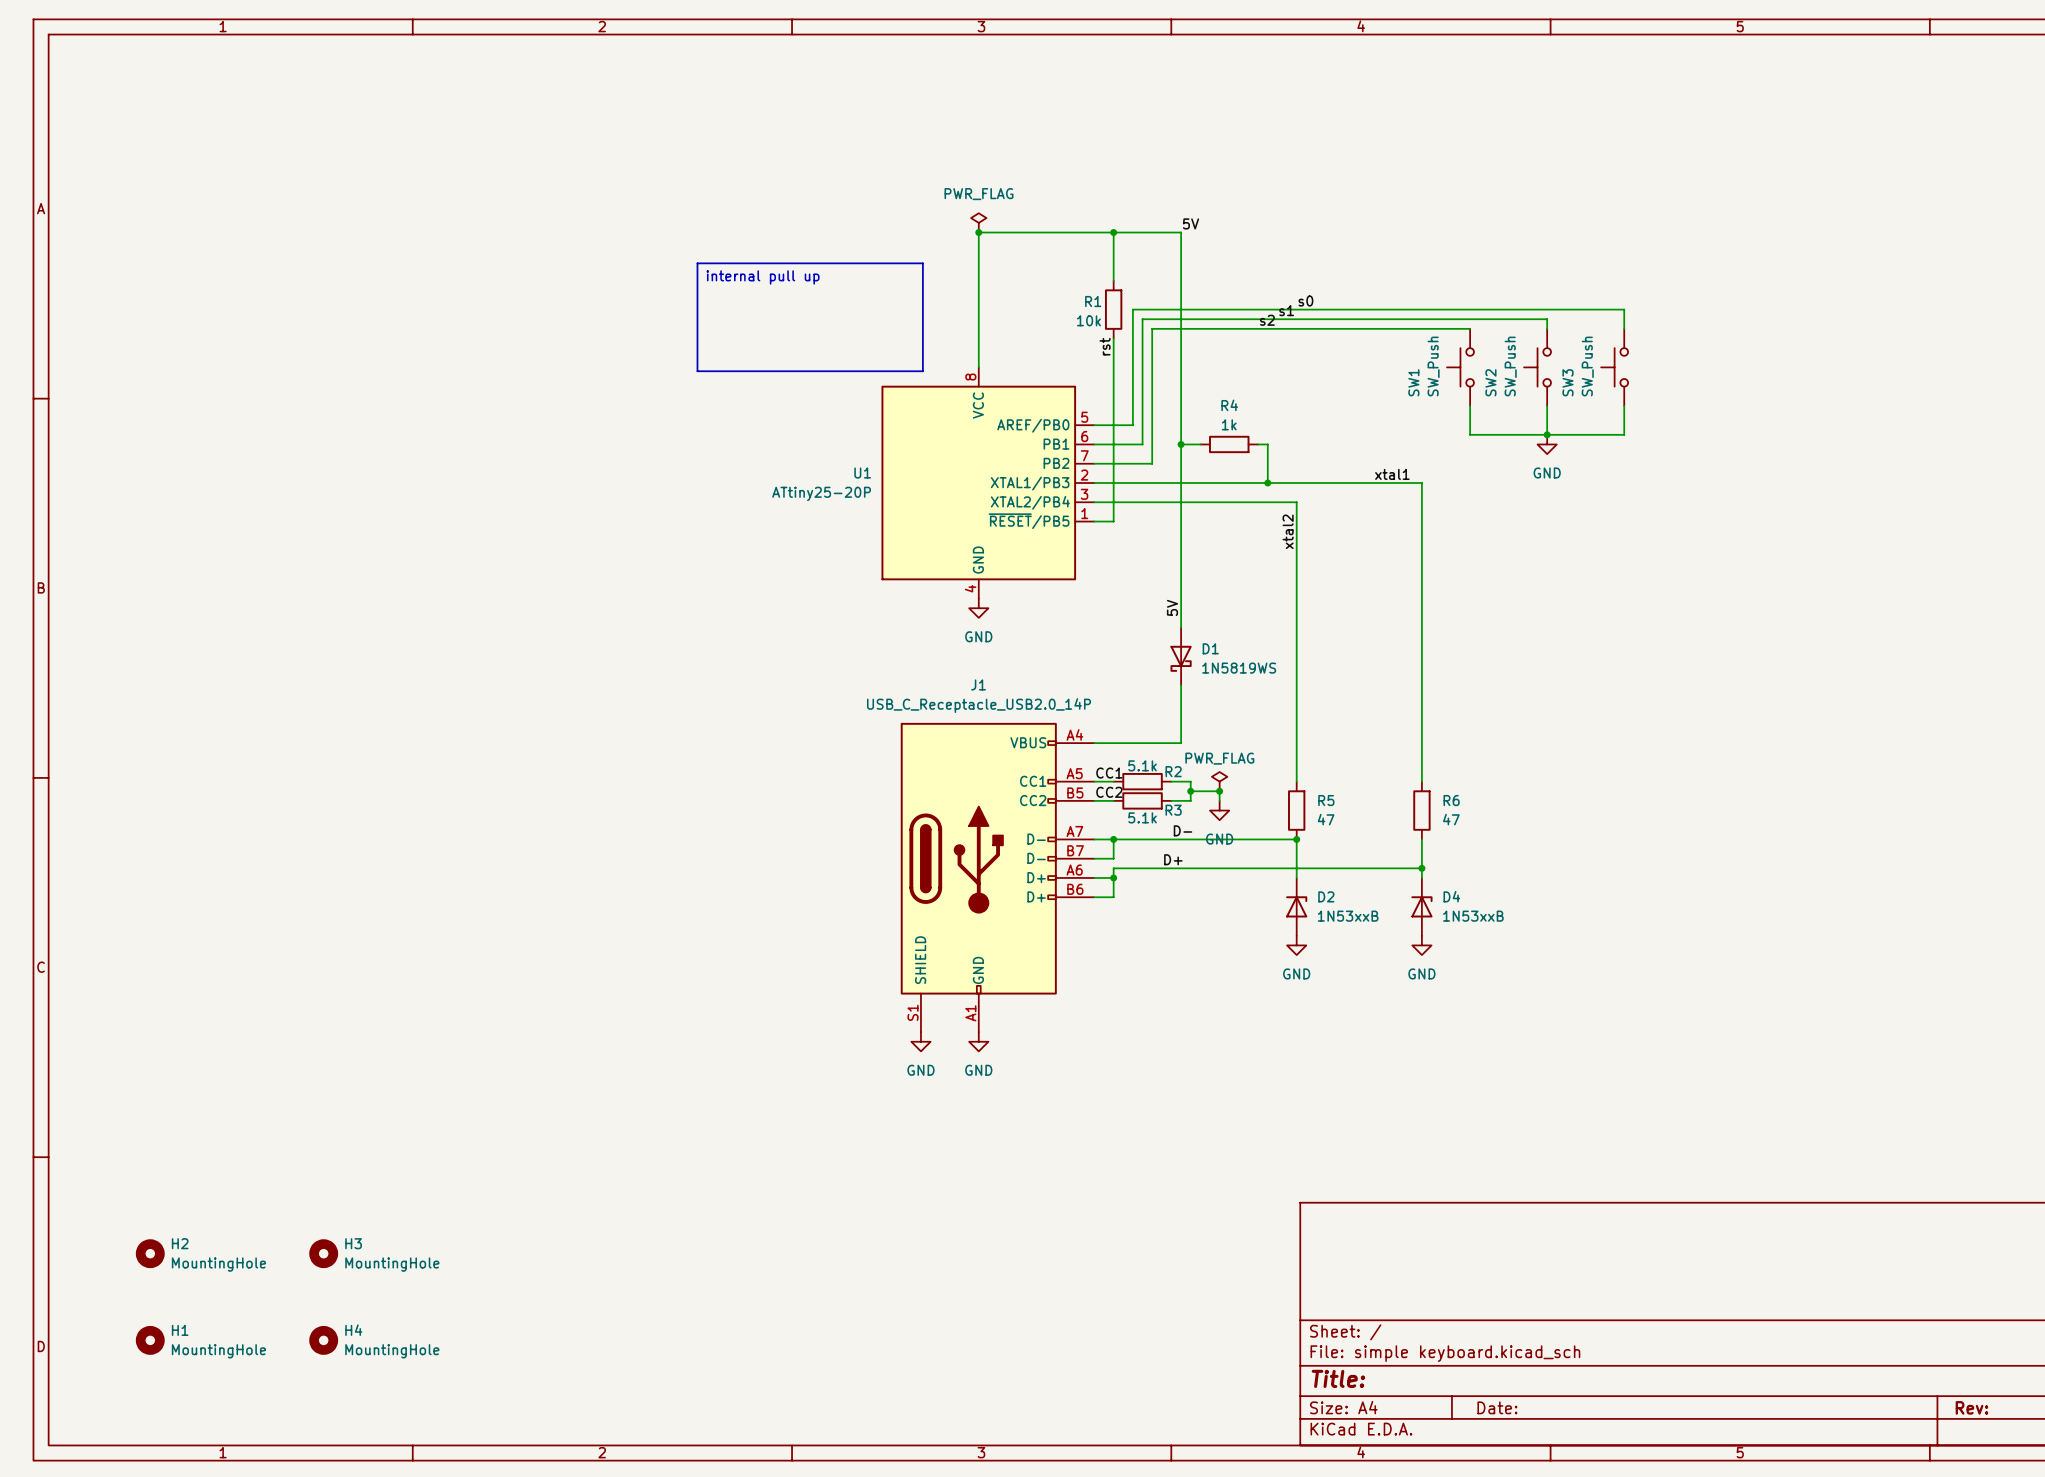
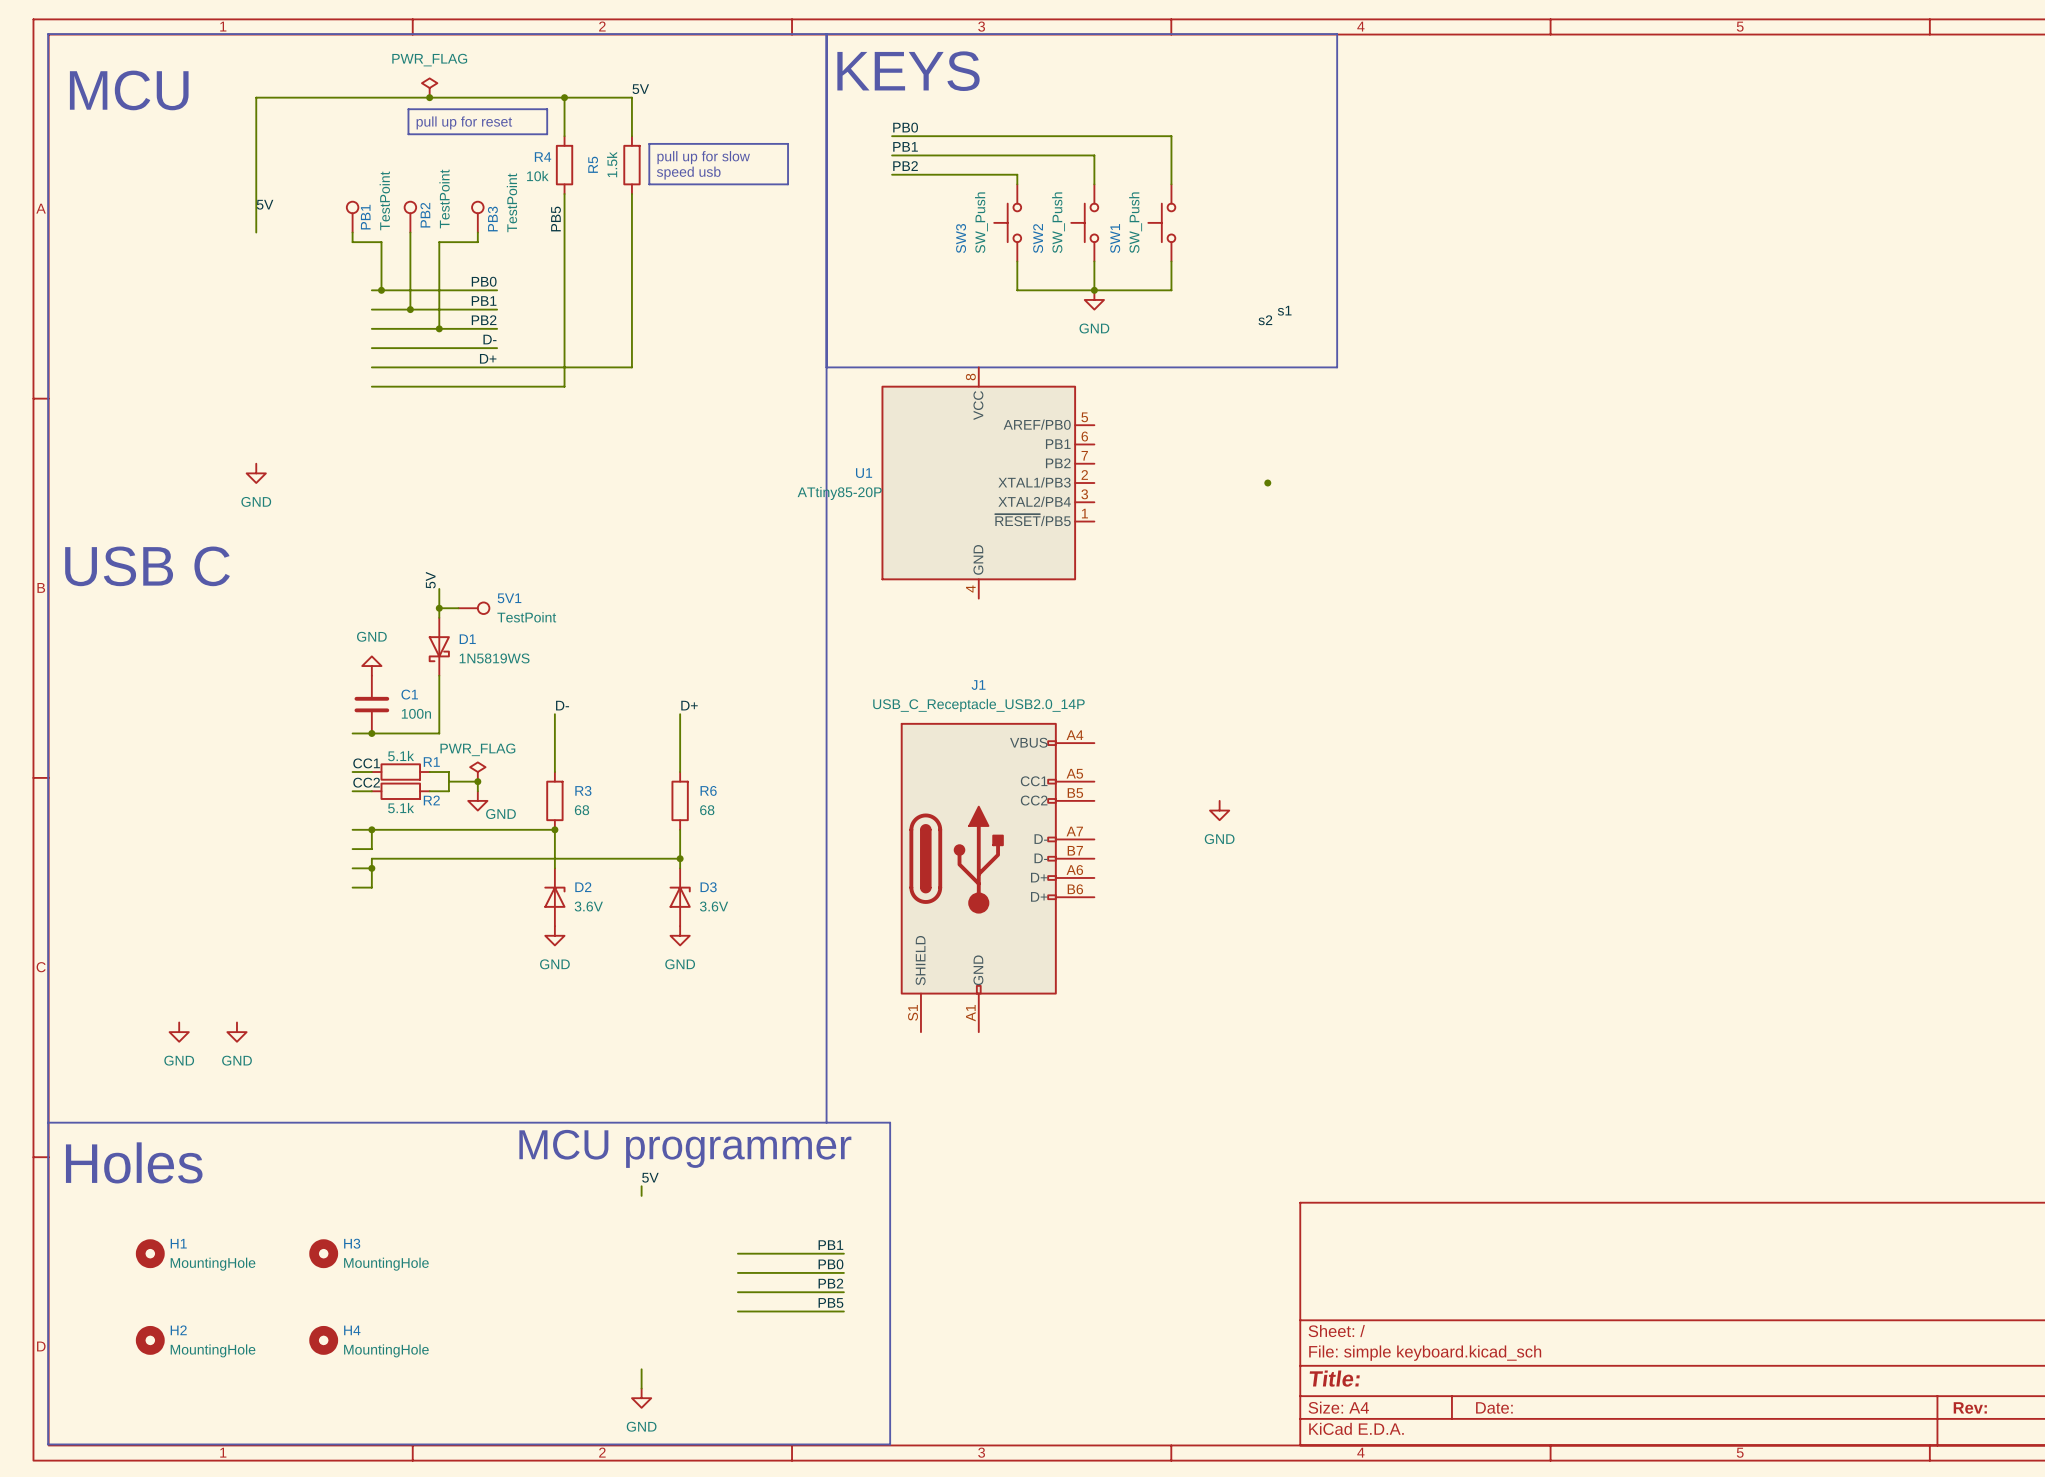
line: none -> (826, 34) (826, 1122)
text: none -> KEYS (908, 71)
power symbol: none -> PWR_FLAG (429, 88)
label: none -> 5V (640, 89)
text: none -> MCU (129, 90)
junction: none -> (429, 97)
wire: none -> (564, 97) (564, 136)
junction: none -> (564, 97)
line: none -> (408, 109) (547, 109) (547, 134) (408, 134) (408, 109)
text: none -> pull up for reset (464, 122)
label: none -> PB0 (905, 127)
wire: none -> (631, 136) (631, 97) (256, 97) (256, 232)
wire: none -> (892, 136) (1171, 136) (1171, 184)
line: none -> (649, 143) (788, 143) (788, 184) (649, 184) (649, 143)
label: none -> PB1 (905, 146)
wire: none -> (892, 155) (1094, 155) (1094, 184)
text: none -> pull up for slow (703, 157)
label: none -> PB2 (905, 166)
text: none -> speed usb (688, 173)
wire: none -> (892, 174) (1017, 174) (1017, 184)
wire: none -> (564, 193) (564, 386) (371, 386)
wire: none -> (631, 193) (631, 367) (371, 367)
label: none -> 5V (265, 204)
PB1: none -> TestPoint (352, 217)
PB2: none -> TestPoint (410, 217)
PB3: none -> TestPoint (477, 217)
label: none -> PB5 (556, 219)
power symbol: PWR_FLAG (978, 222) -> none
label: 5V (1191, 223) -> none
wire: none -> (352, 232) (352, 242) (381, 242) (381, 290)
wire: none -> (410, 232) (410, 309)
wire: none -> (477, 232) (477, 242) (439, 242) (439, 328)
junction: (978, 232) -> none
wire: (1113, 232) (1113, 280) -> none
junction: (1113, 232) -> none
wire: none -> (1017, 261) (1017, 290) (1171, 290) (1171, 261)
wire: none -> (1094, 261) (1094, 290)
line: (697, 263) (922, 263) (922, 371) (697, 371) (697, 263) -> none
text: internal pull up (763, 277) -> none
label: none -> PB0 (484, 281)
wire: none -> (371, 290) (497, 290)
junction: none -> (381, 290)
junction: none -> (1094, 290)
power symbol: none -> GND (1094, 299)
label: none -> PB1 (484, 301)
R1 name position: R1 (1093, 301) -> R1 (431, 762)
label: s0 (1305, 301) -> none
wire: none -> (371, 309) (497, 309)
junction: none -> (410, 309)
R1 rotation: 0° (1113, 309) -> 90° clockwise (400, 772)
R1 position: (1113, 309) -> (400, 772)
label: none -> PB2 (484, 320)
R1 value: 10k (1088, 320) -> 5.1k (401, 756)
wire: none -> (371, 328) (497, 328)
junction: none -> (439, 328)
wire: (1470, 328) (1152, 328) (1152, 463) (1094, 463) -> none
wire: (1547, 328) (1547, 319) (1142, 319) (1142, 444) (1094, 444) -> none
wire: (1624, 328) (1624, 309) (1132, 309) (1132, 425) (1094, 425) -> none
wire: (1113, 338) (1113, 521) (1094, 521) -> none
label: none -> D- (489, 339)
label: rst (1105, 346) -> none
wire: none -> (371, 348) (497, 348)
label: none -> D+ (488, 358)
line: none -> (826, 367) (1337, 367) (1337, 34) (48, 34) (48, 1444) (890, 1444) (890, 1122) (48, 1122)
wire: (978, 367) (978, 232) (1181, 232) (1181, 627) -> none
SW1 position: (1460, 367) -> (1161, 222)
SW2 position: (1537, 367) -> (1084, 222)
SW3 position: (1614, 367) -> (1007, 222)
R4 name position: R4 (1229, 405) -> R4 (543, 157)
wire: (1470, 405) (1470, 434) (1624, 434) (1624, 405) -> none
wire: (1547, 405) (1547, 434) -> none
R4 value: 1k (1229, 424) -> 10k (537, 176)
junction: (1547, 434) -> none
wire: (1181, 444) (1200, 444) -> none
junction: (1181, 444) -> none
R4 rotation: 0° (1229, 444) -> 90° clockwise (564, 165)
R4 position: (1229, 444) -> (564, 165)
wire: (1258, 444) (1267, 444) (1267, 483) -> none
power symbol: GND (1547, 444) -> none
power symbol: none -> GND (256, 473)
label: xtal1 (1392, 474) -> none
wire: (1094, 483) (1421, 483) (1421, 781) -> none
U1 value: ATtiny25-20P (821, 493) -> ATtiny85-20P (839, 493)
wire: (1094, 502) (1296, 502) (1296, 781) -> none
label: xtal2 (1288, 531) -> none
text: none -> USB C (147, 566)
label: none -> 5V (430, 580)
wire: none -> (439, 588) (439, 617)
label: 5V (1172, 607) -> none
wire: none -> (439, 608) (458, 608)
junction: none -> (439, 608)
5V1: none -> TestPoint (473, 608)
power symbol: GND (978, 608) -> none
D1 position: (1181, 656) -> (439, 646)
power symbol: none -> GND (371, 666)
wire: none -> (439, 675) (439, 733) (352, 733)
wire: (1181, 685) (1181, 743) (1094, 743) -> none
C1: none -> 100n (371, 704)
label: none -> D- (562, 705)
label: none -> D+ (689, 705)
wire: none -> (554, 714) (554, 772)
wire: none -> (680, 714) (680, 772)
junction: none -> (371, 733)
label: none -> CC1 (366, 763)
R2 value position: 5.1k (1142, 765) -> 5.1k (401, 808)
R2 name position: R2 (1173, 771) -> R2 (431, 800)
wire: none -> (352, 772) (371, 772)
wire: none -> (429, 772) (448, 772) (448, 791) (429, 791)
power symbol: none -> PWR_FLAG (477, 772)
label: CC1 (1109, 773) -> none
wire: none -> (448, 781) (477, 781) (477, 791)
junction: none -> (477, 781)
wire: (1094, 781) (1113, 781) -> none
R2 position: (1142, 781) -> (400, 791)
wire: (1171, 781) (1190, 781) (1190, 800) (1171, 800) -> none
power symbol: PWR_FLAG (1219, 781) -> none
label: none -> CC2 (366, 782)
wire: none -> (352, 791) (371, 791)
wire: (1190, 791) (1219, 791) (1219, 800) -> none
junction: (1190, 791) -> none
junction: (1219, 791) -> none
label: CC2 (1109, 792) -> none
power symbol: none -> GND (477, 800)
wire: (1094, 800) (1113, 800) -> none
R3 rotation: 0° (1142, 800) -> 90° clockwise (554, 800)
R3 position: (1142, 800) -> (554, 800)
R5 name rotation: 0° (1326, 800) -> 90° counterclockwise (593, 164)
R5 name position: R5 (1326, 800) -> R5 (593, 164)
R3 name position: R3 (1173, 810) -> R3 (583, 790)
R5 position: (1296, 810) -> (631, 165)
R6 position: (1421, 810) -> (680, 800)
R3 value: 5.1k (1142, 817) -> 68 (582, 810)
R5 value: 47 (1326, 819) -> 1.5k (612, 164)
R6 value: 47 (1451, 819) -> 68 (707, 810)
wire: none -> (352, 829) (554, 829) (554, 868)
wire: none -> (371, 829) (371, 849) (352, 849)
junction: none -> (371, 829)
junction: none -> (554, 829)
wire: none -> (680, 829) (680, 868)
label: D- (1182, 830) -> none
wire: (1094, 839) (1296, 839) (1296, 877) -> none
wire: (1113, 839) (1113, 858) (1094, 858) -> none
junction: (1113, 839) -> none
junction: (1296, 839) -> none
wire: (1421, 839) (1421, 877) -> none
wire: none -> (680, 858) (371, 858) (371, 887) (352, 887)
junction: none -> (680, 858)
label: D+ (1173, 859) -> none
wire: none -> (352, 868) (371, 868)
junction: none -> (371, 868)
wire: (1421, 868) (1113, 868) (1113, 897) (1094, 897) -> none
junction: (1421, 868) -> none
wire: (1094, 877) (1113, 877) -> none
junction: (1113, 877) -> none
D3: none -> 3.6V (680, 897)
D2 position: (1296, 906) -> (554, 897)
D4: 1N53xxB (1421, 906) -> none
D2 value: 1N53xxB (1348, 916) -> 3.6V (588, 906)
power symbol: none -> GND (554, 935)
power symbol: none -> GND (680, 935)
power symbol: GND (1296, 945) -> none
power symbol: GND (1421, 945) -> none
power symbol: none -> GND (179, 1032)
power symbol: none -> GND (236, 1032)
power symbol: GND (920, 1041) -> none
power symbol: GND (978, 1041) -> none
text: none -> MCU programmer (685, 1148)
text: none -> Holes (134, 1162)
label: none -> 5V (650, 1177)
wire: none -> (641, 1186) (641, 1195)
H2 name: H2 (180, 1243) -> H1 (178, 1243)
label: none -> PB1 (830, 1245)
wire: none -> (737, 1253) (843, 1253)
label: none -> PB0 (830, 1264)
wire: none -> (737, 1272) (843, 1272)
label: none -> PB2 (830, 1283)
wire: none -> (737, 1292) (843, 1292)
label: none -> PB5 (830, 1302)
wire: none -> (737, 1311) (843, 1311)
H1 name: H1 (180, 1330) -> H2 (178, 1330)
wire: none -> (641, 1369) (641, 1388)
power symbol: none -> GND (641, 1398)

